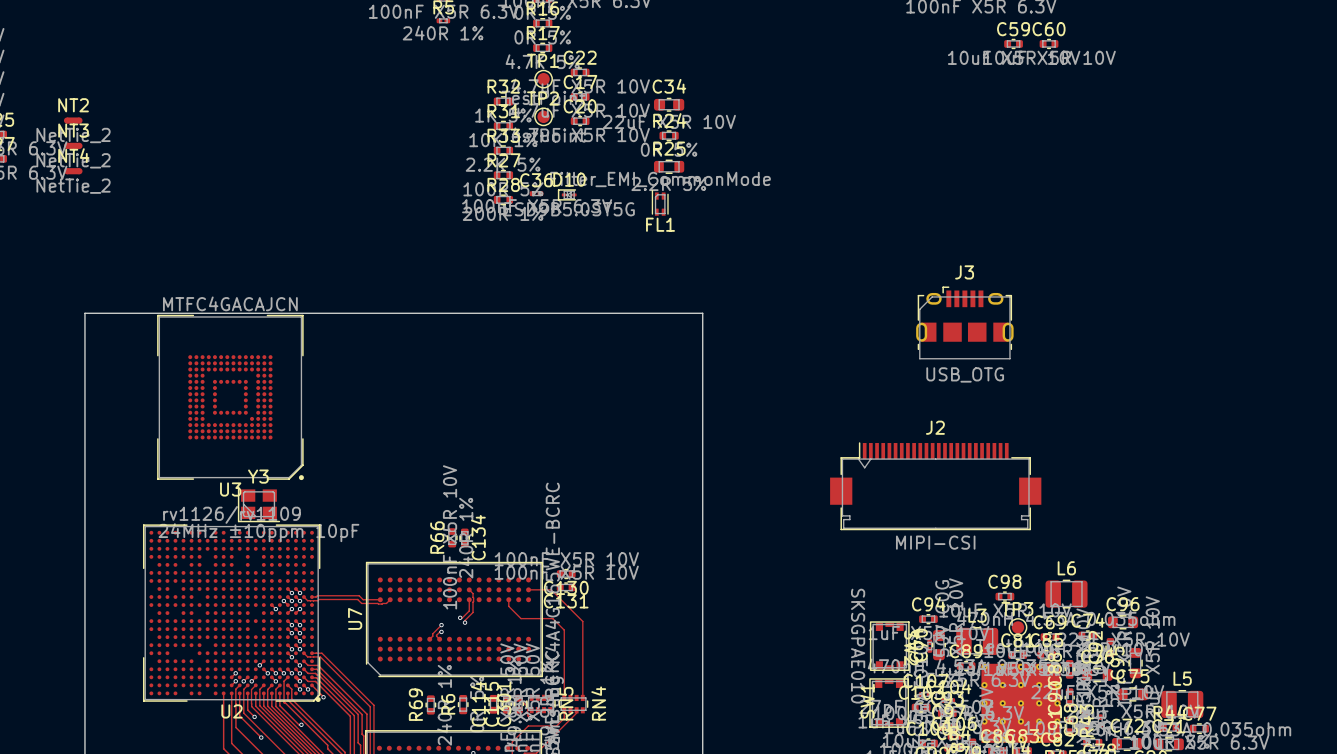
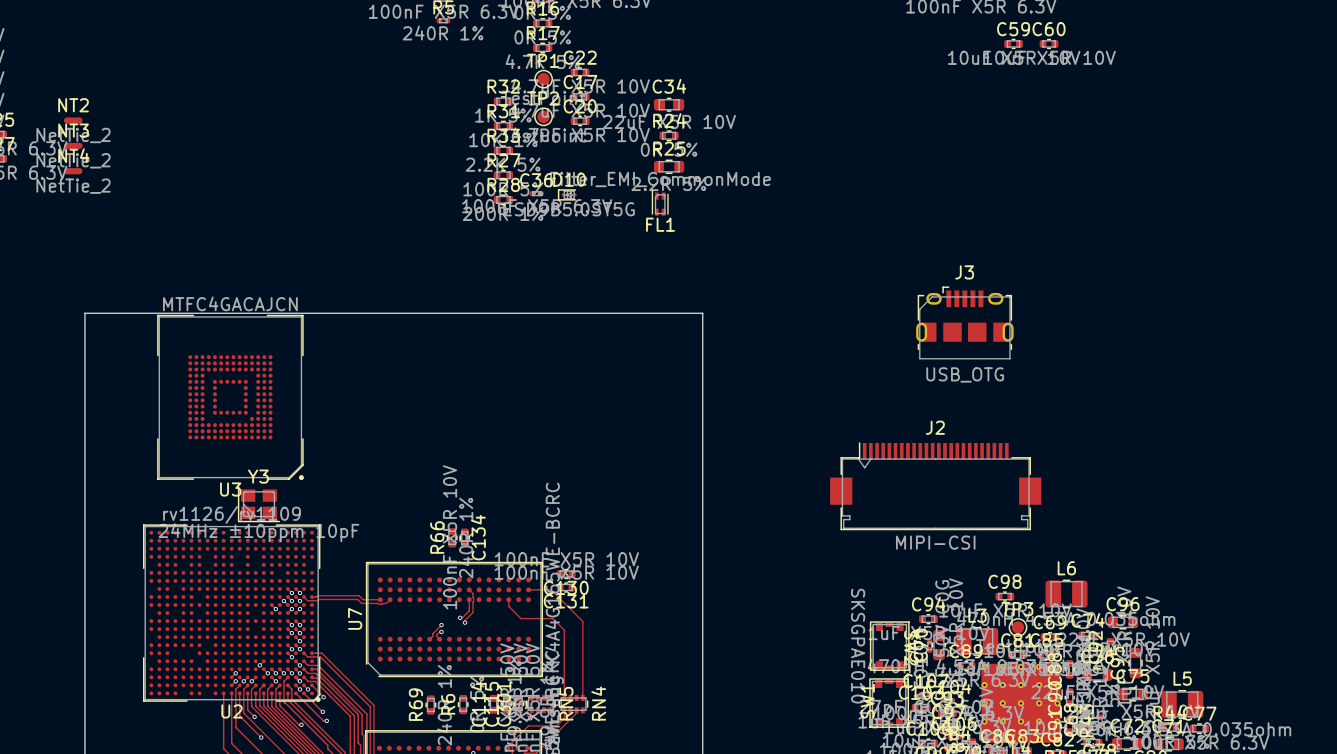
track: none -> (295, 693) (323, 720) (326, 720)
track: none -> (303, 693) (322, 711)
via: none -> (322, 711)
via: none -> (326, 720)

